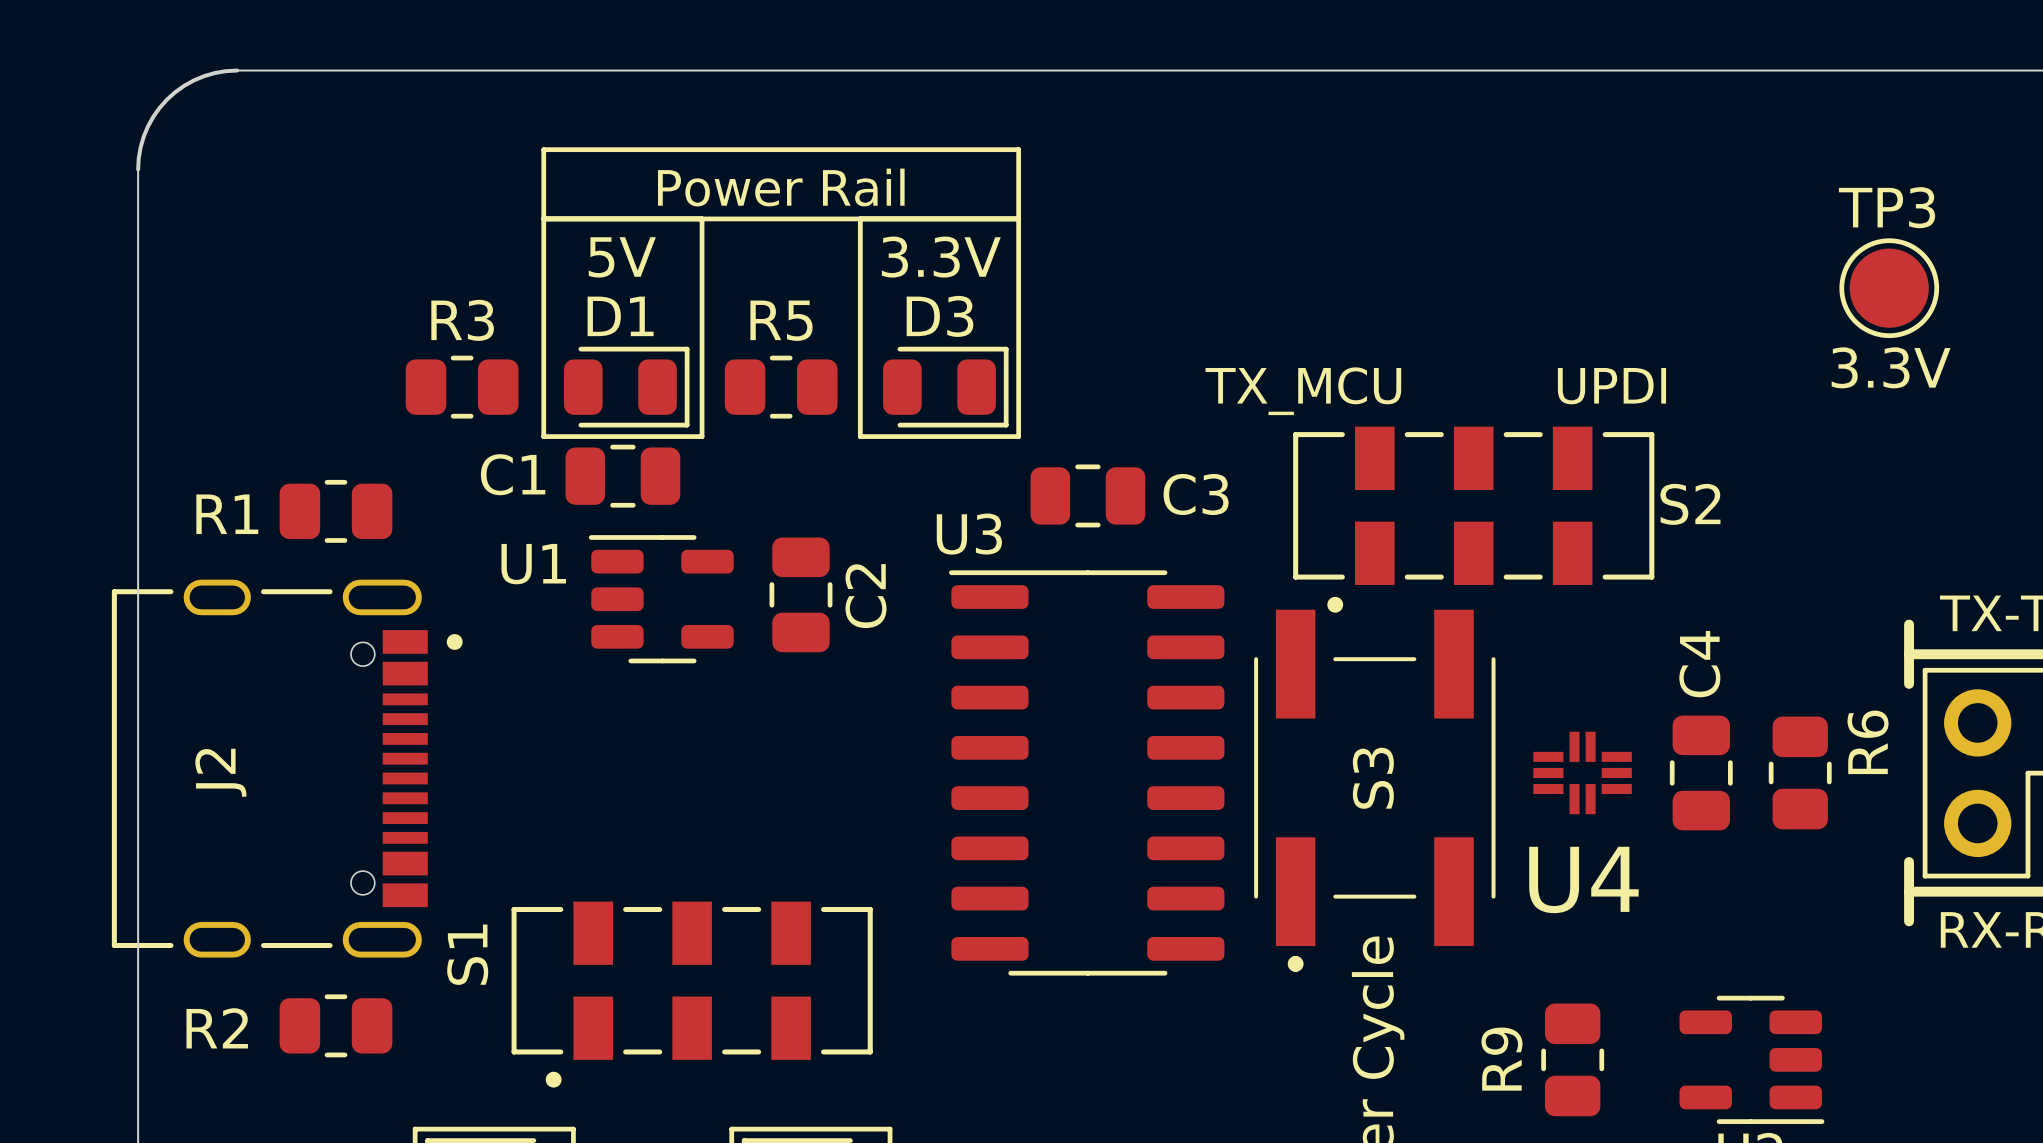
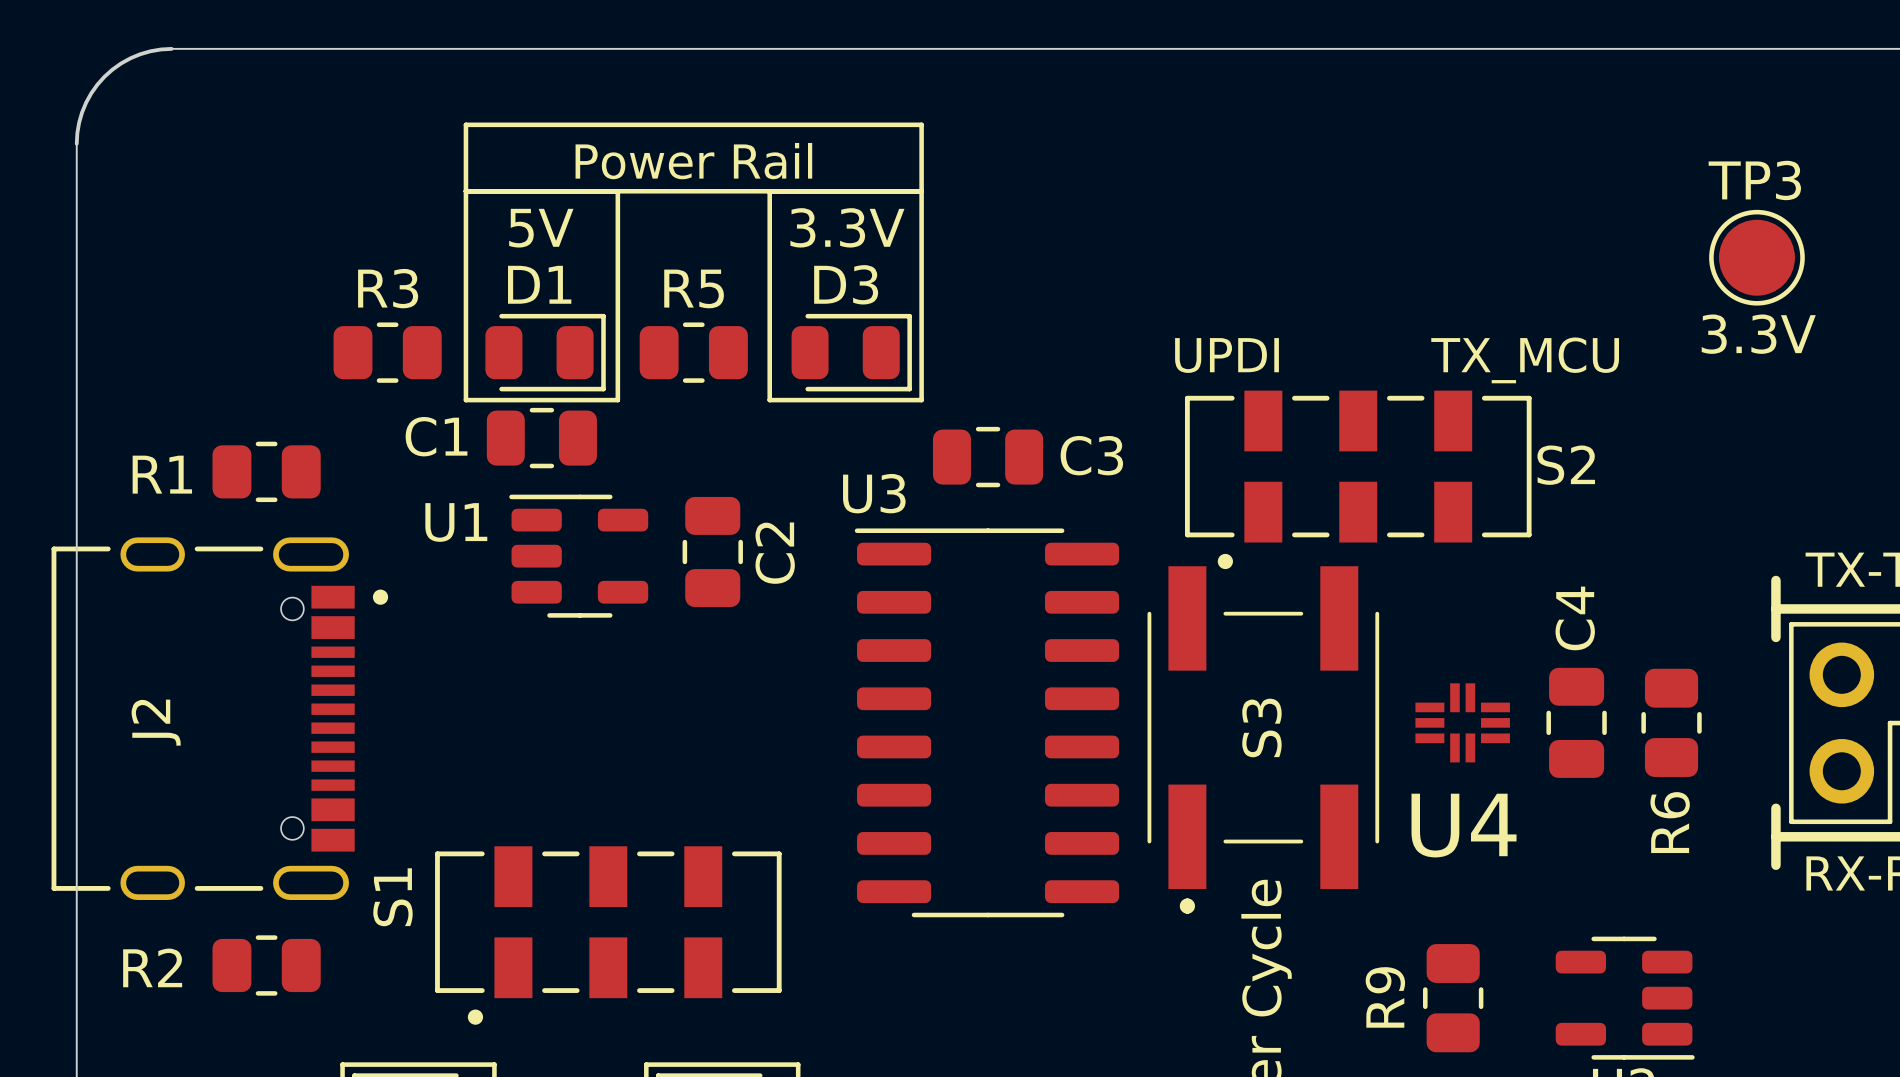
text: UPDI (1611, 386) -> TX_MCU (1525, 360)
text: TX_MCU (1303, 391) -> UPDI (1227, 355)
R6 name position: R6 (1868, 742) -> R6 (1670, 822)

